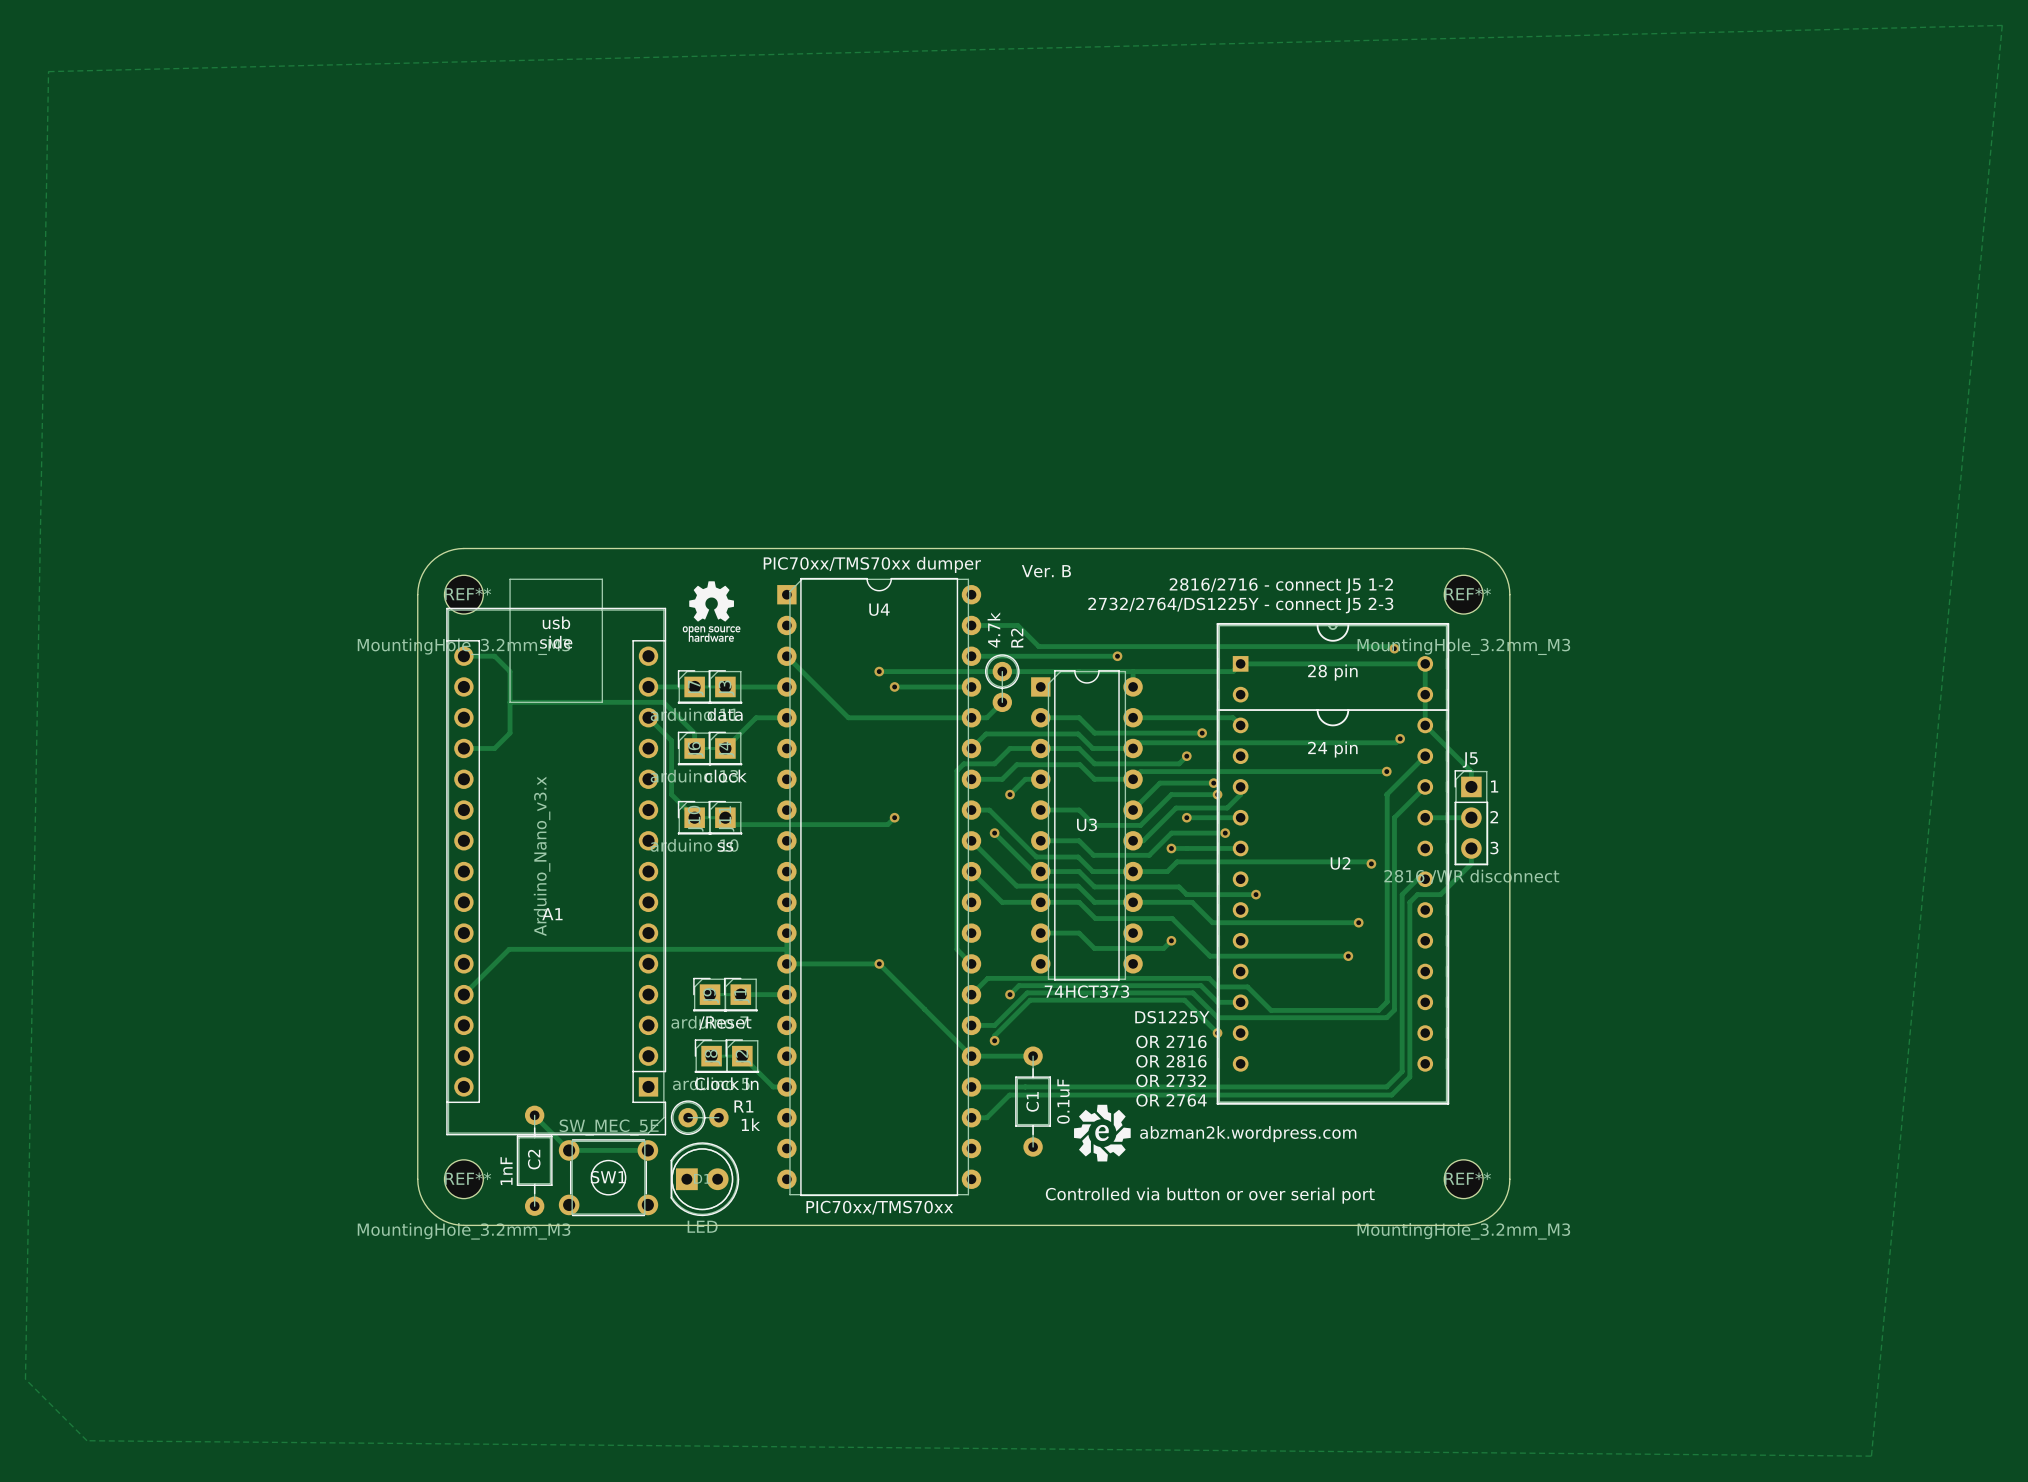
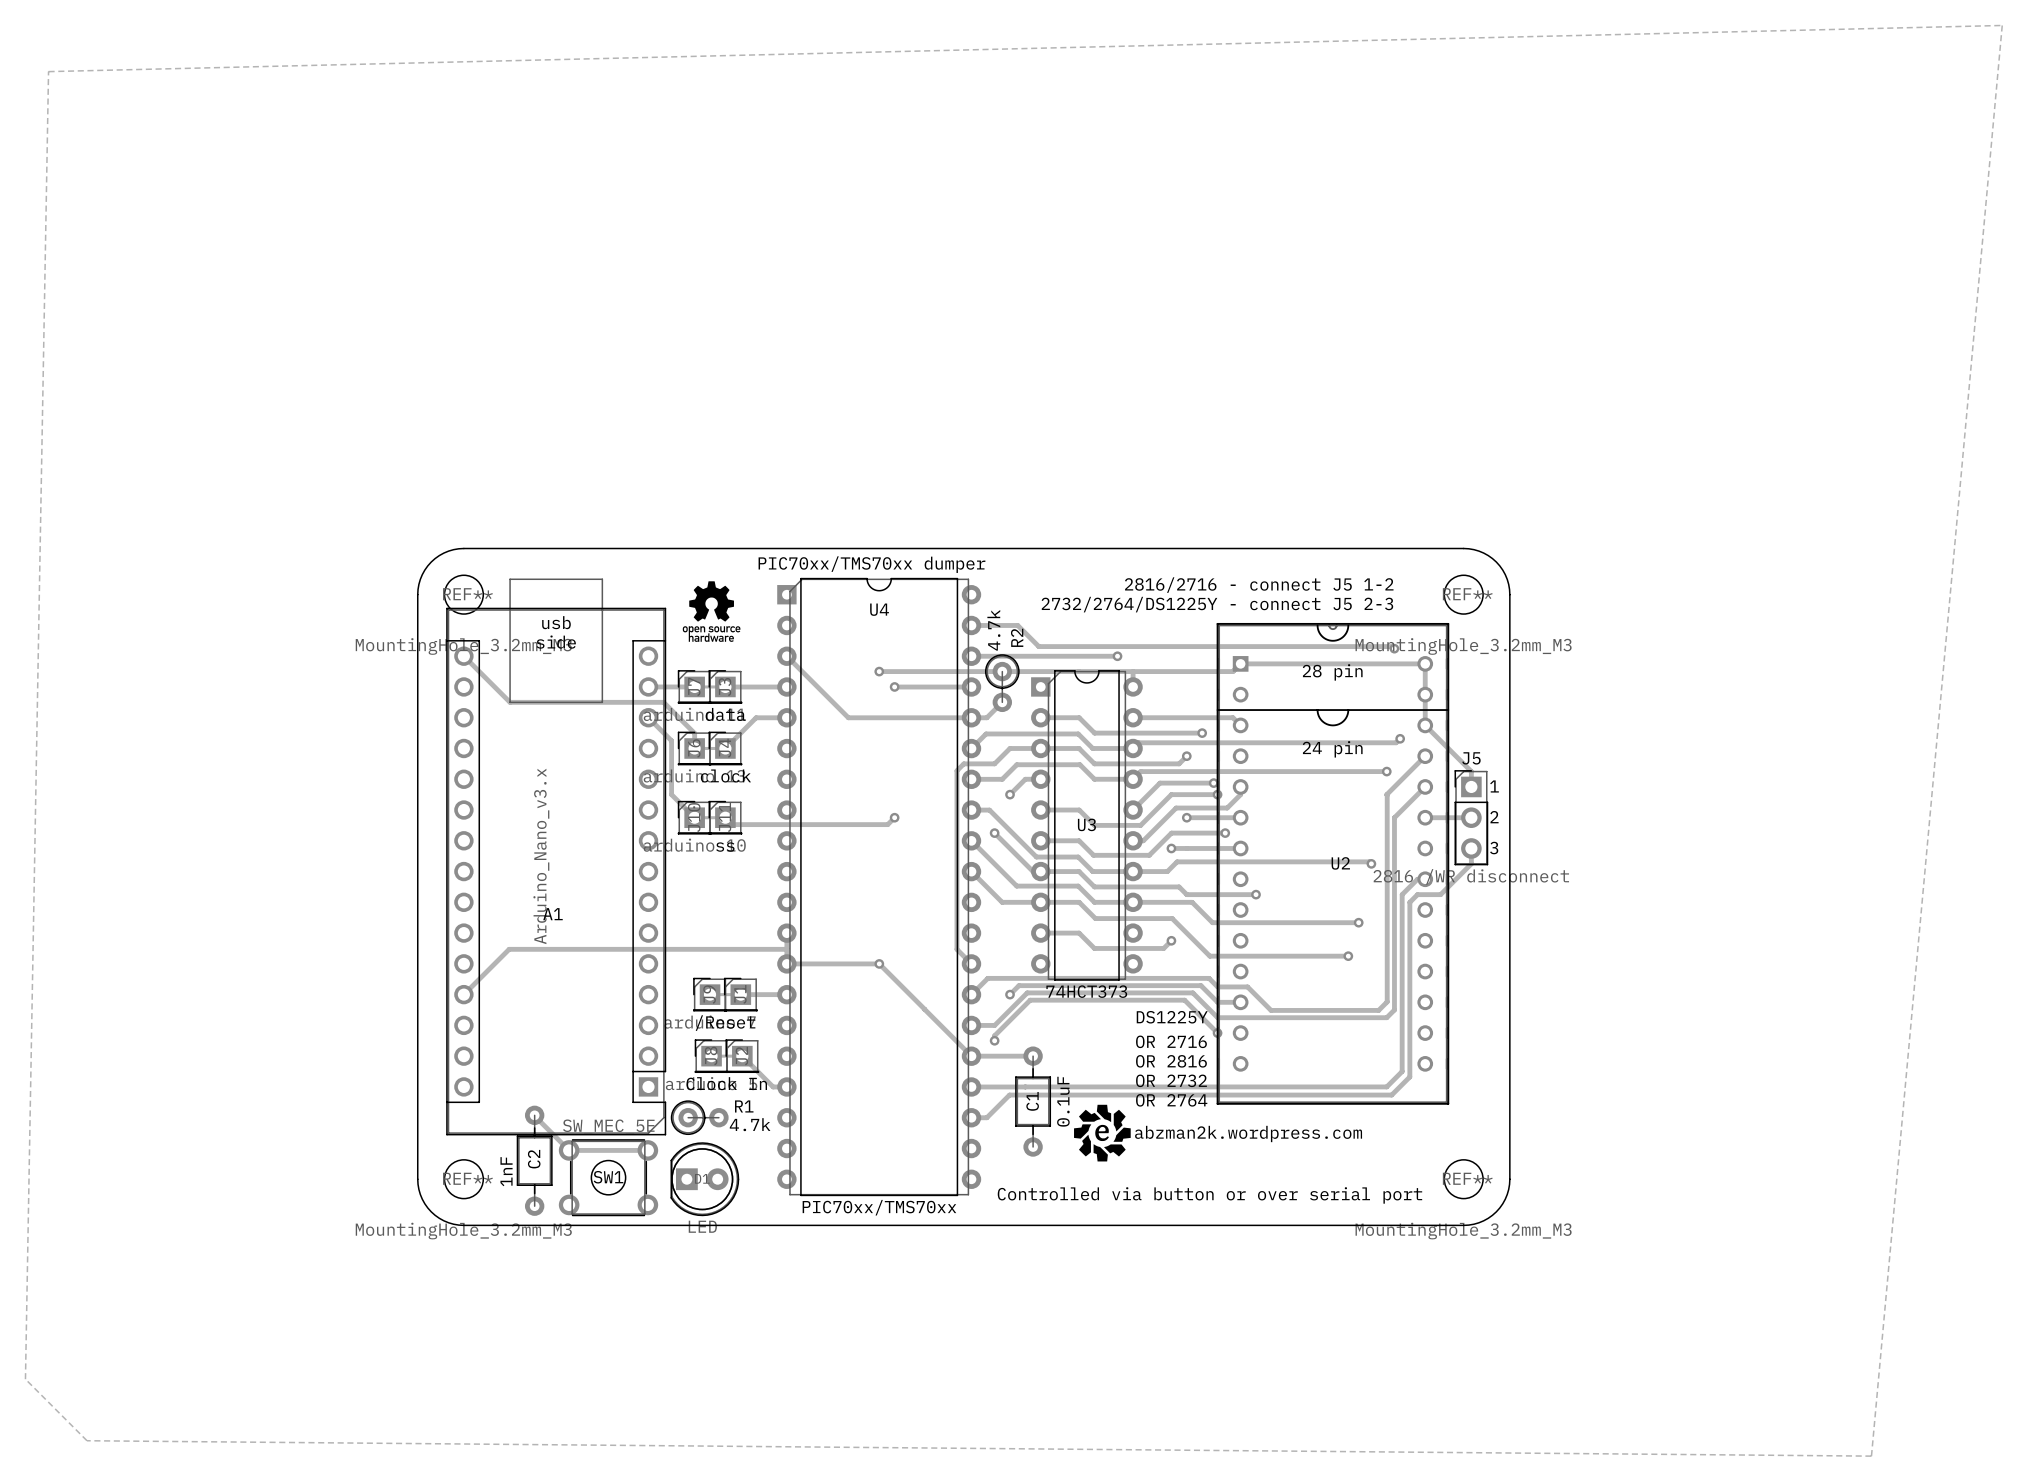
text: Ver. B (1046, 571) -> none
track: (463, 656) (494, 656) (510, 671) (510, 733) (494, 748) (463, 748) -> (463, 656) (510, 702)
R1 value: 1k (750, 1124) -> 4.7k (750, 1124)

